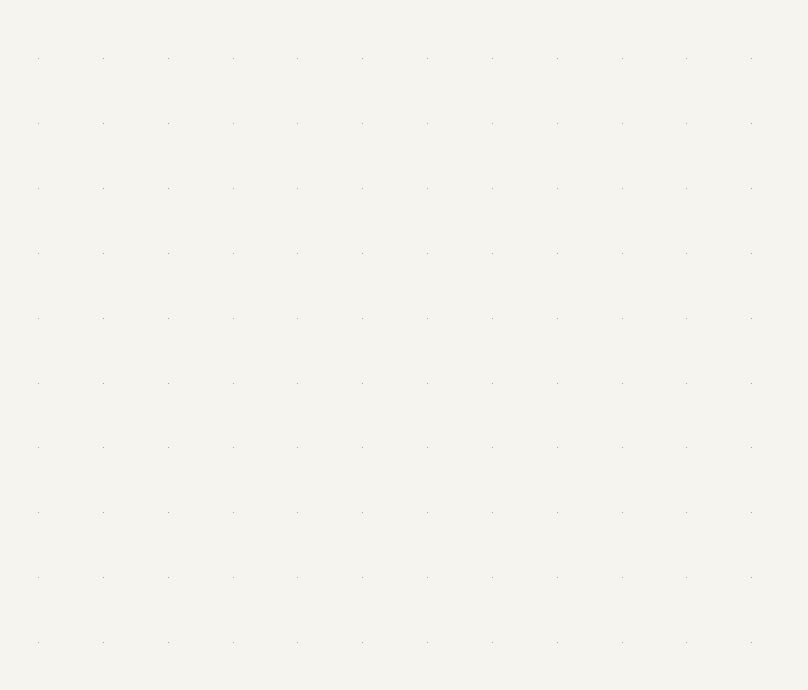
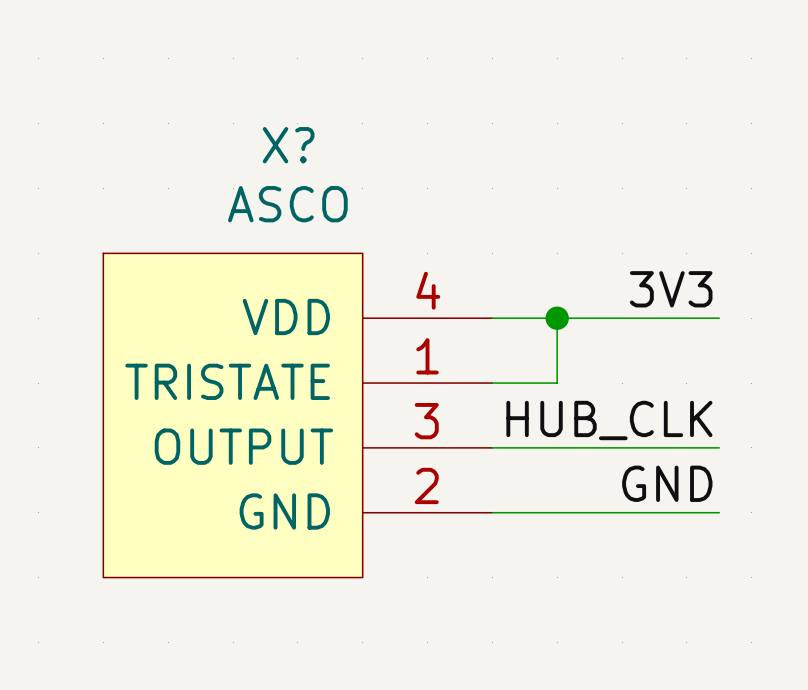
label: none -> 3V3 (671, 289)
wire: none -> (492, 318) (719, 318)
wire: none -> (557, 318) (557, 383) (492, 383)
junction: none -> (557, 318)
X?: none -> ASCO (297, 415)
label: none -> HUB_CLK (609, 420)
wire: none -> (492, 447) (719, 447)
label: none -> GND (667, 483)
wire: none -> (492, 512) (719, 512)

